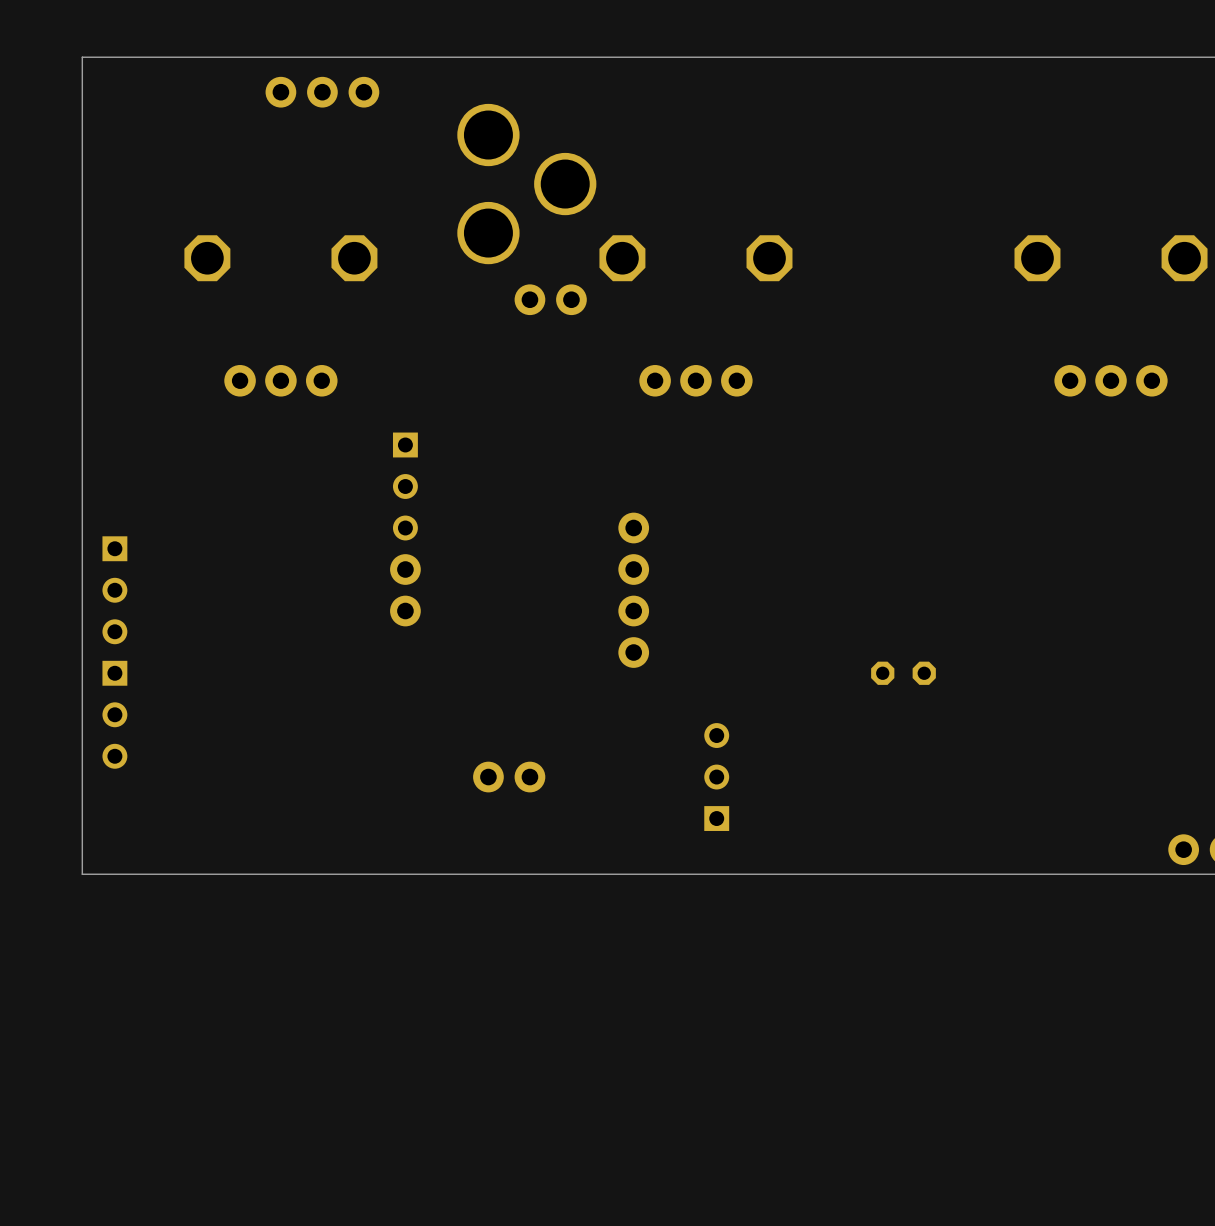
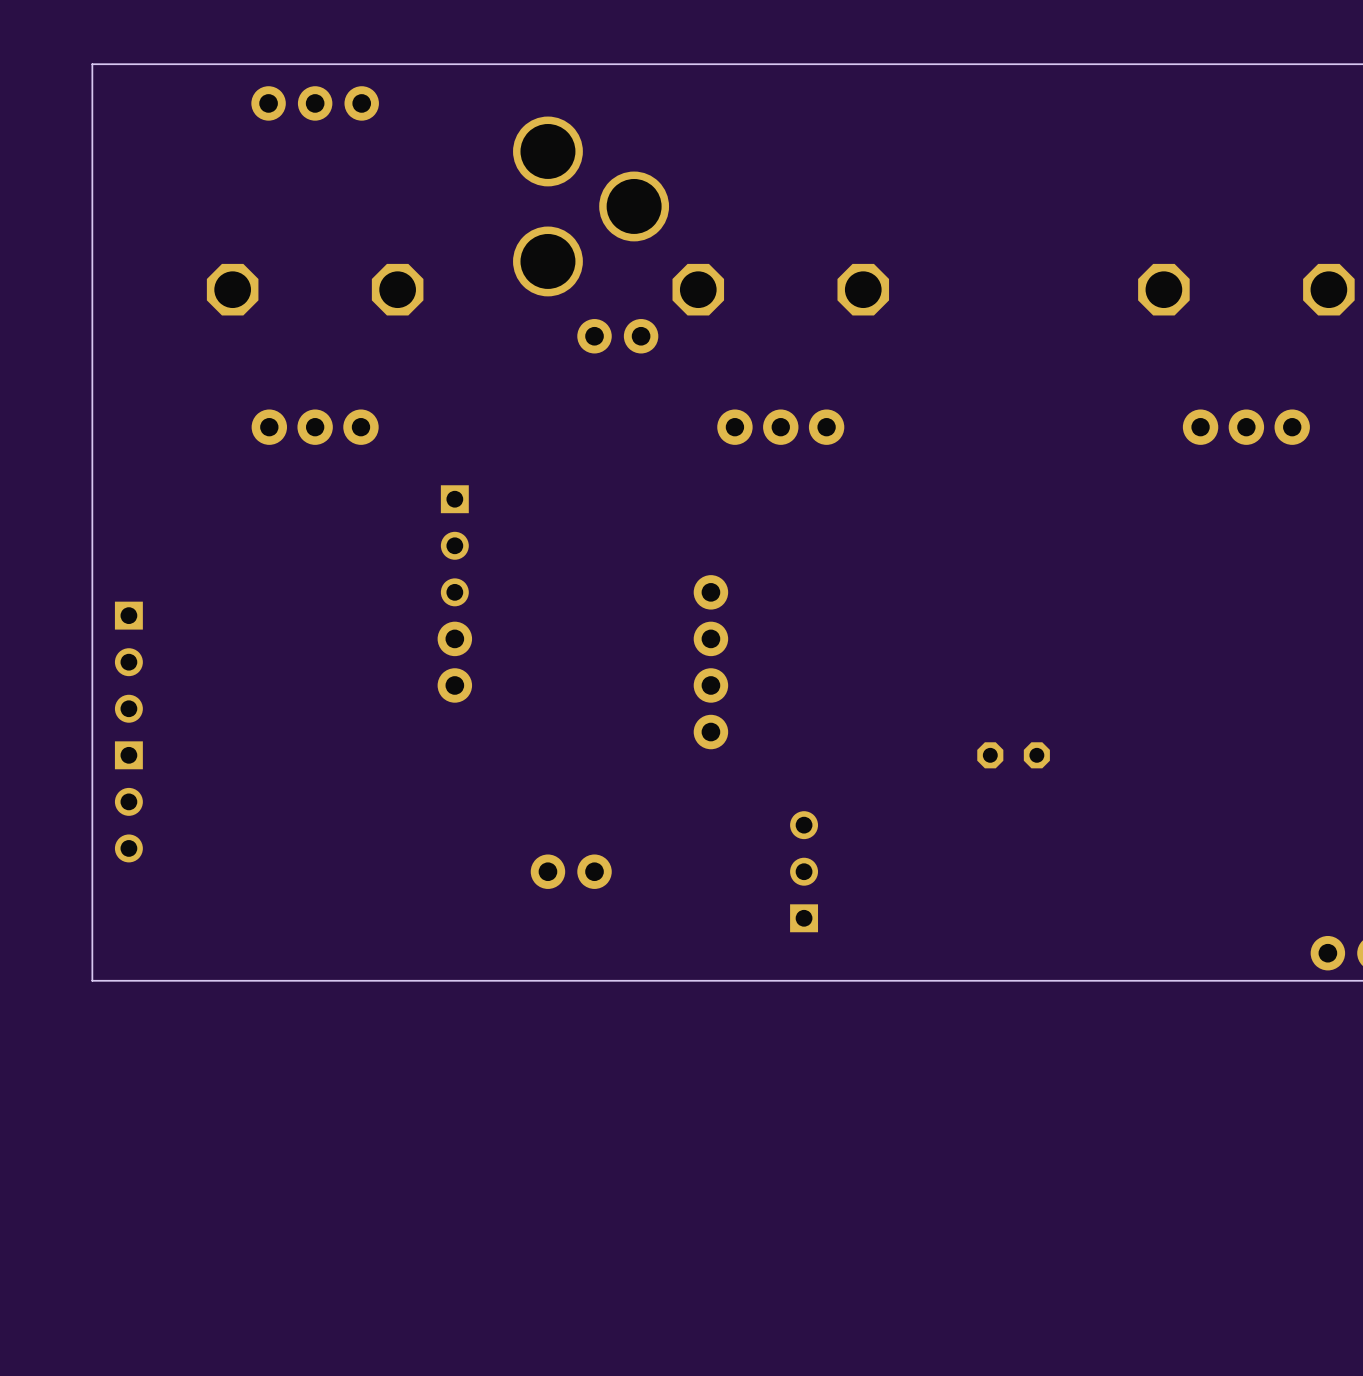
part position: (322, 92) -> (315, 103)

